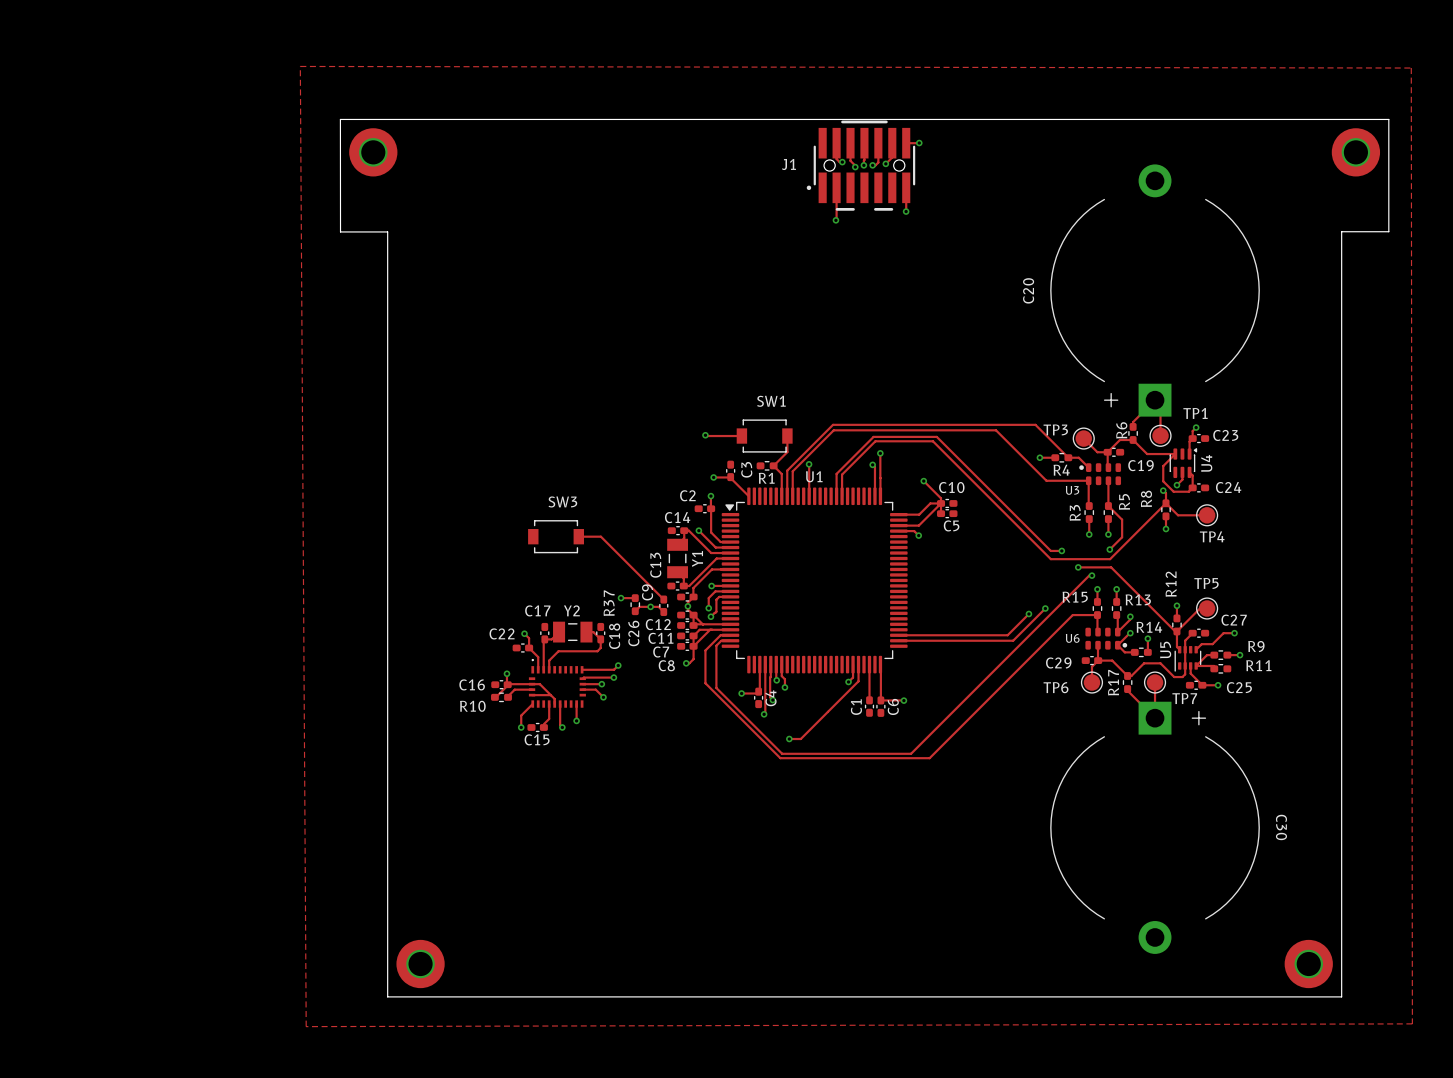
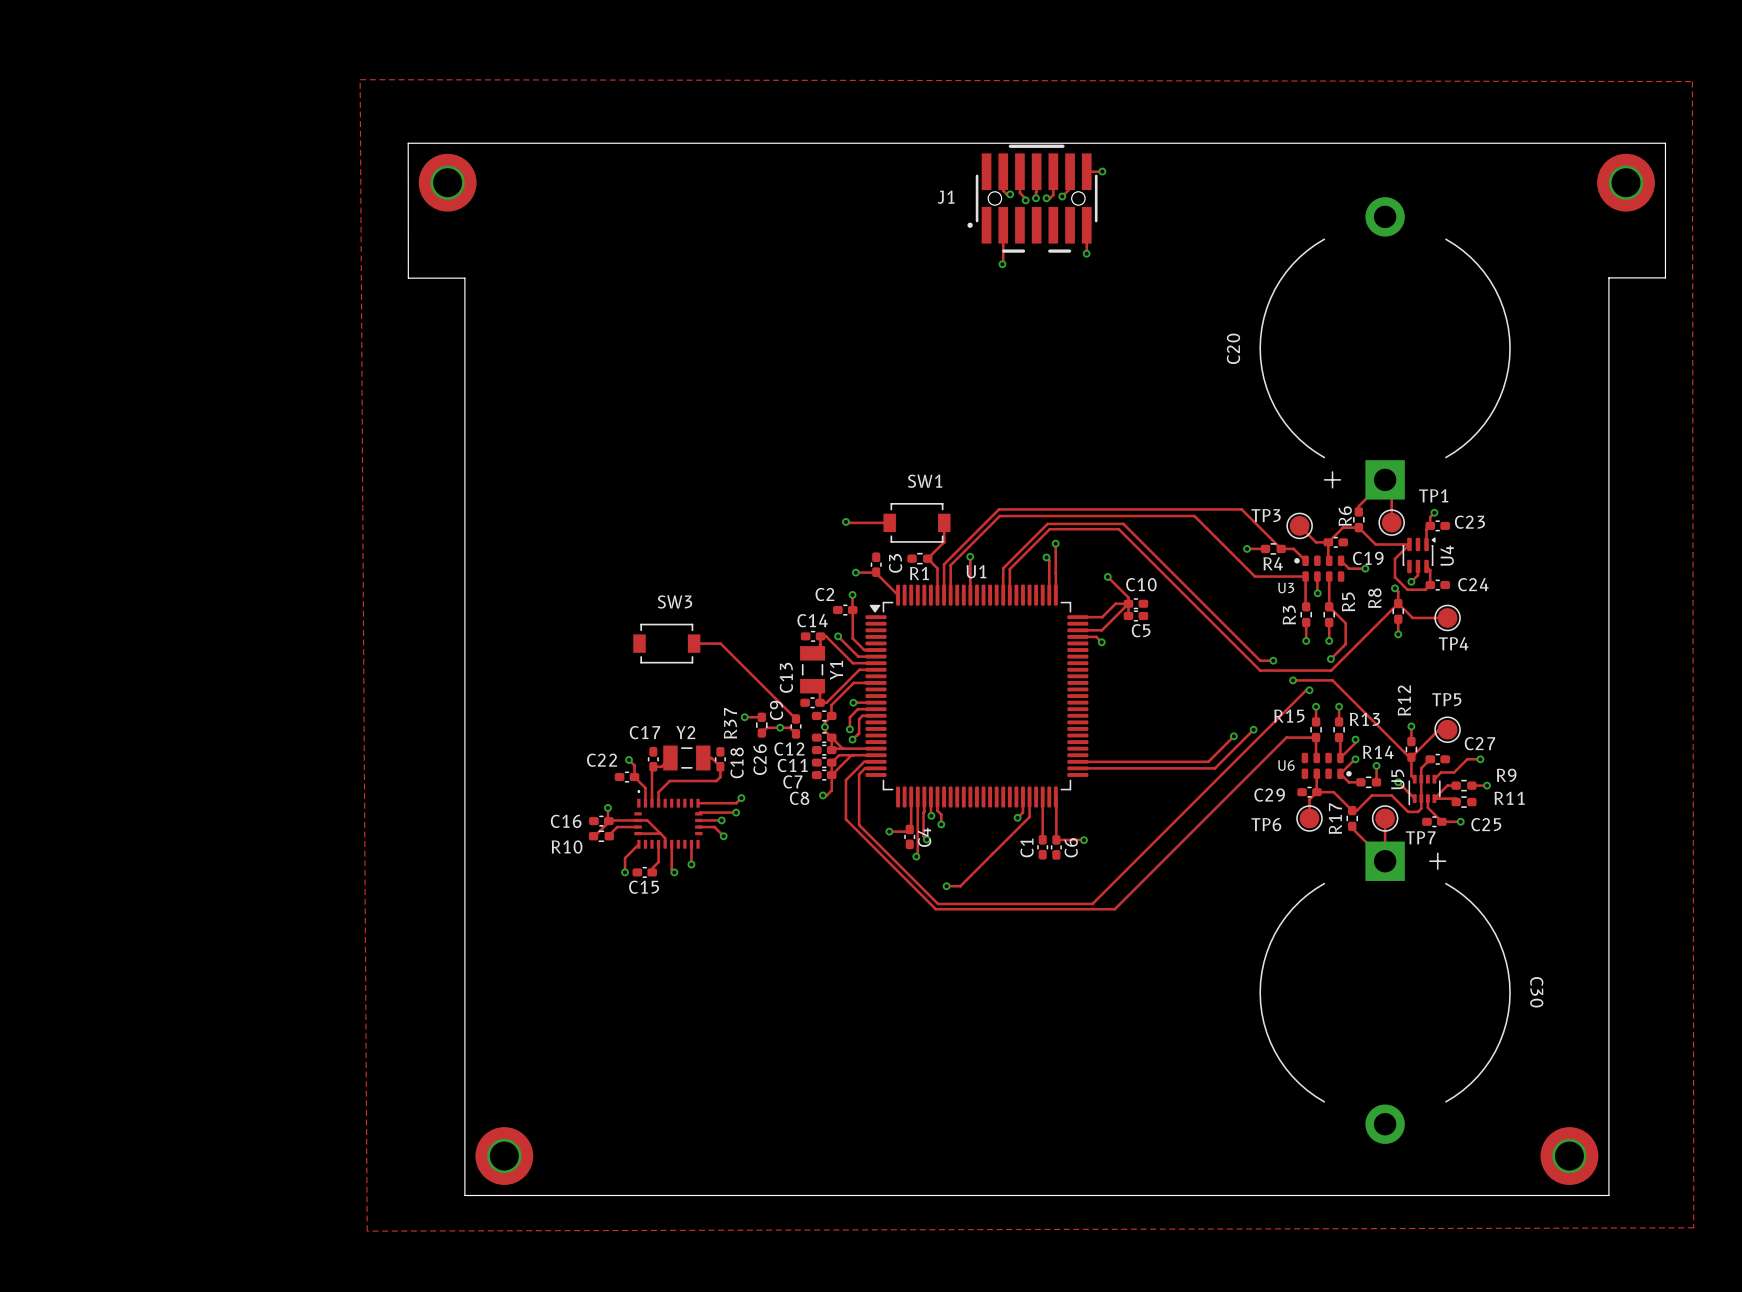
track: none -> (1341, 560) (1348, 568) (1365, 568)
via: none -> (1365, 568)
track: none -> (1317, 576) (1317, 592) (1319, 594)
via: none -> (1317, 593)
track: none -> (1398, 782) (1414, 798)
via: none -> (1398, 782)

